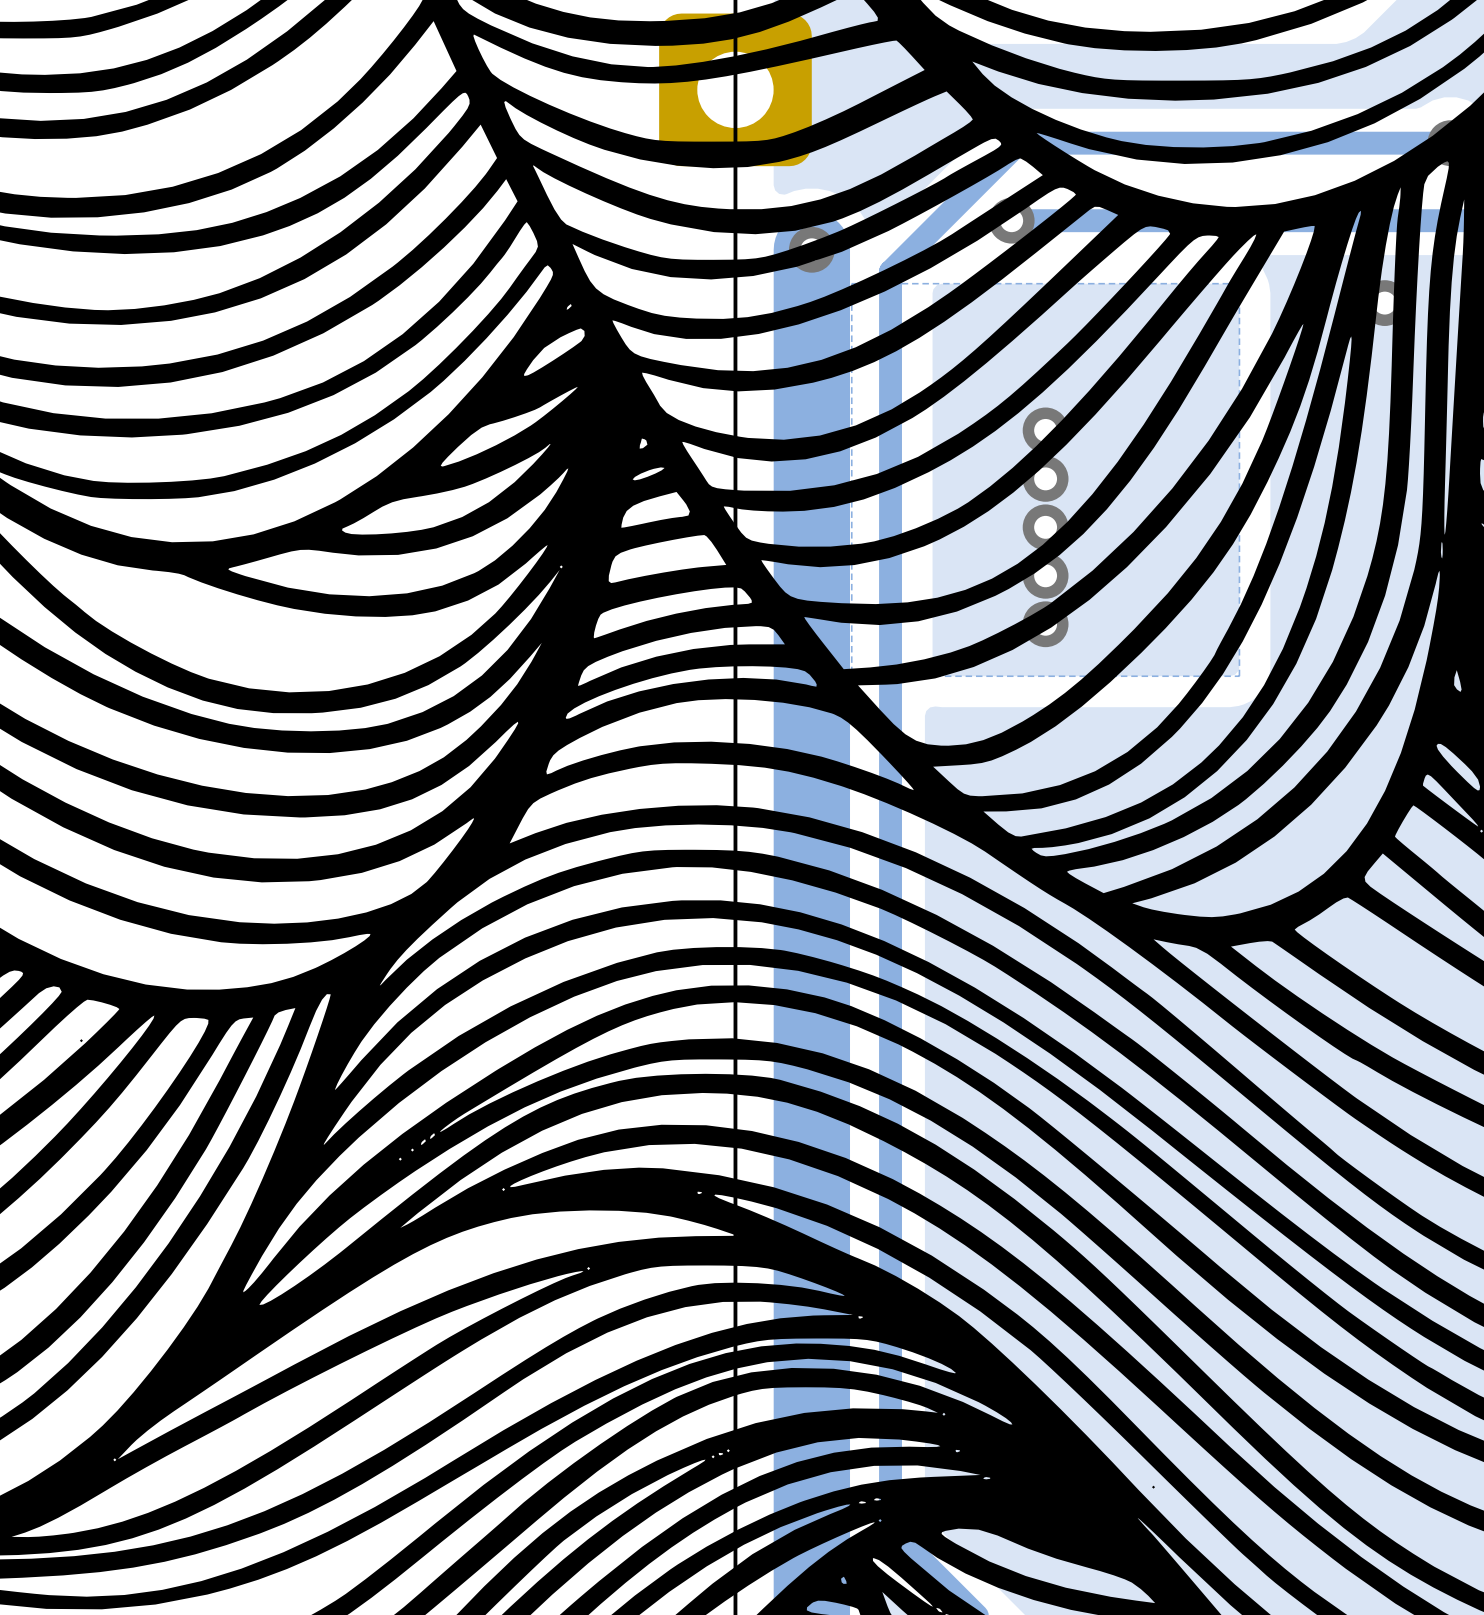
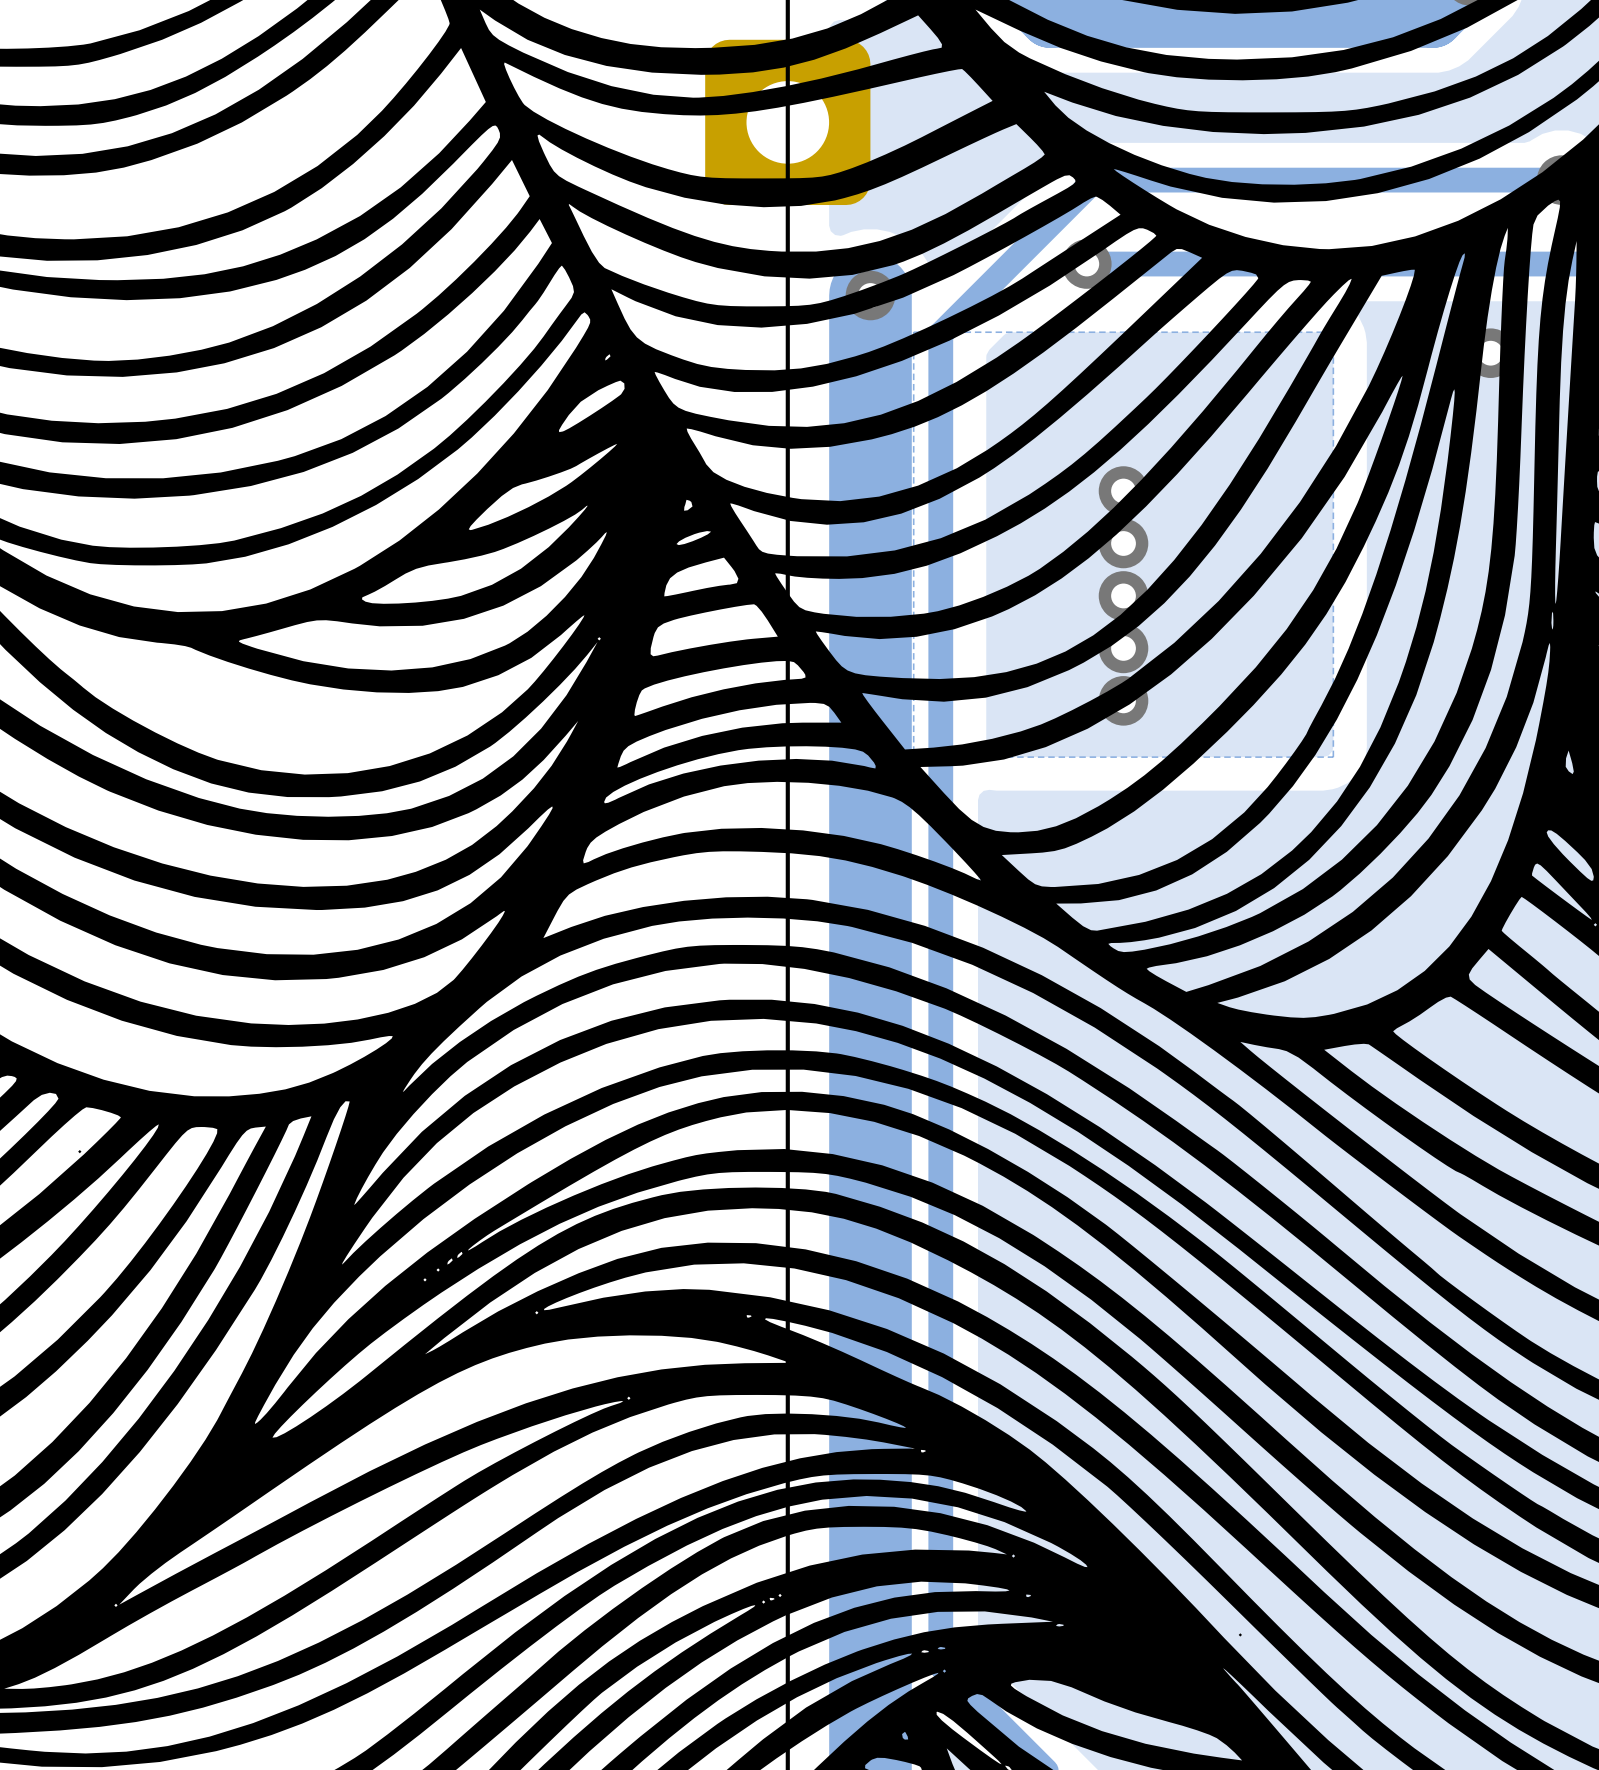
track: (890, 271) (890, 1529) -> (955, 319) (940, 333) (940, 1665) (955, 1680)

